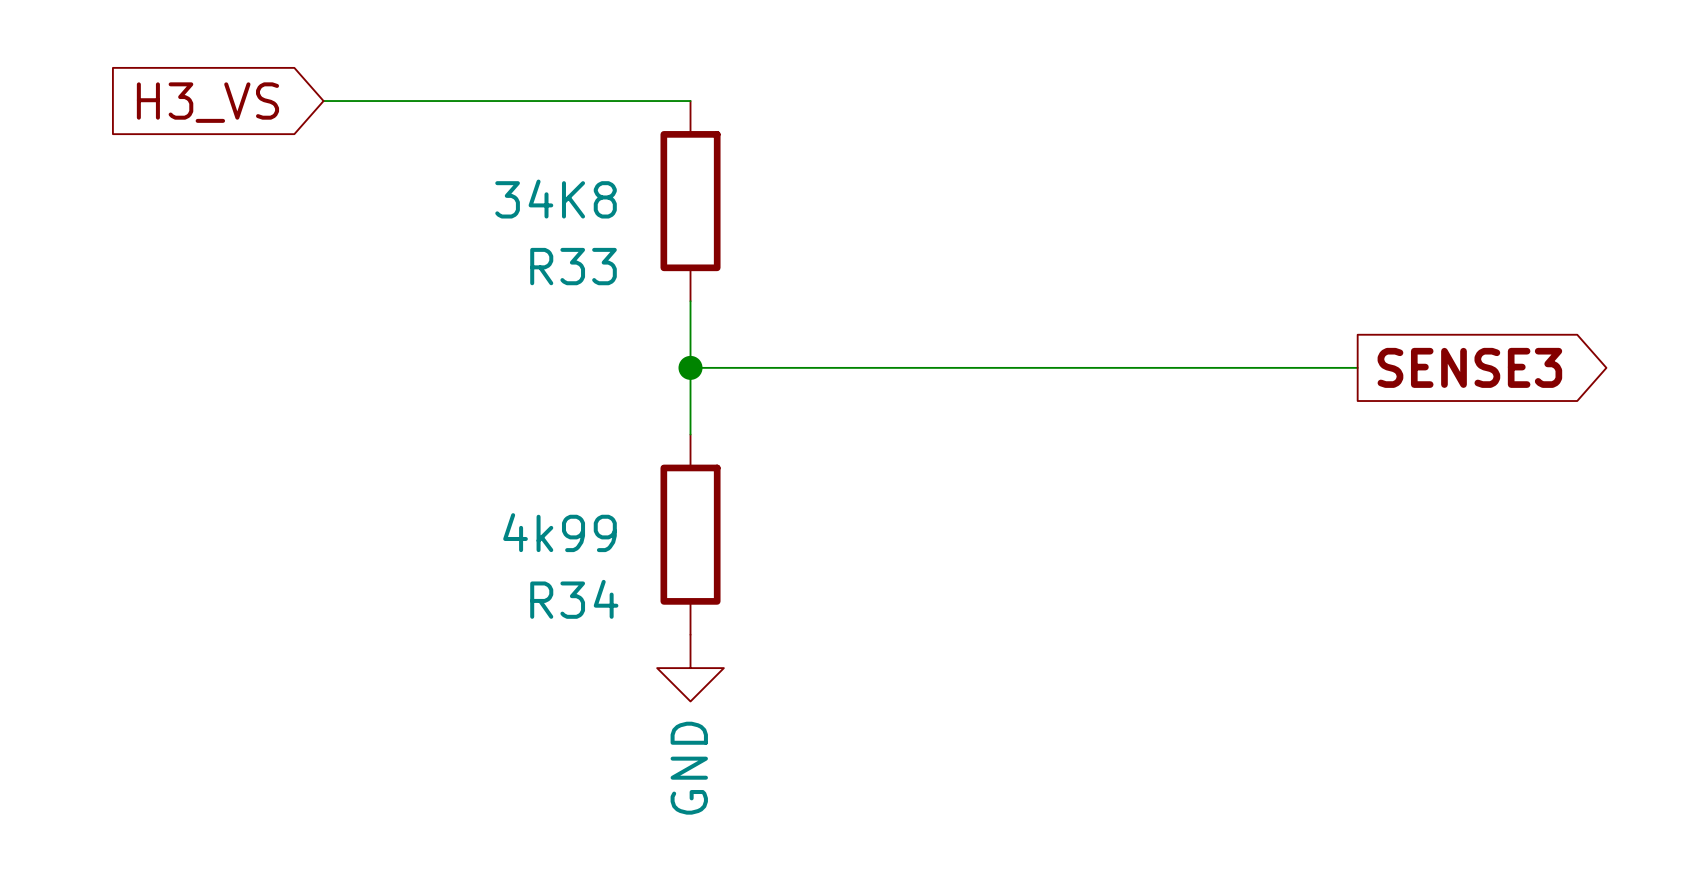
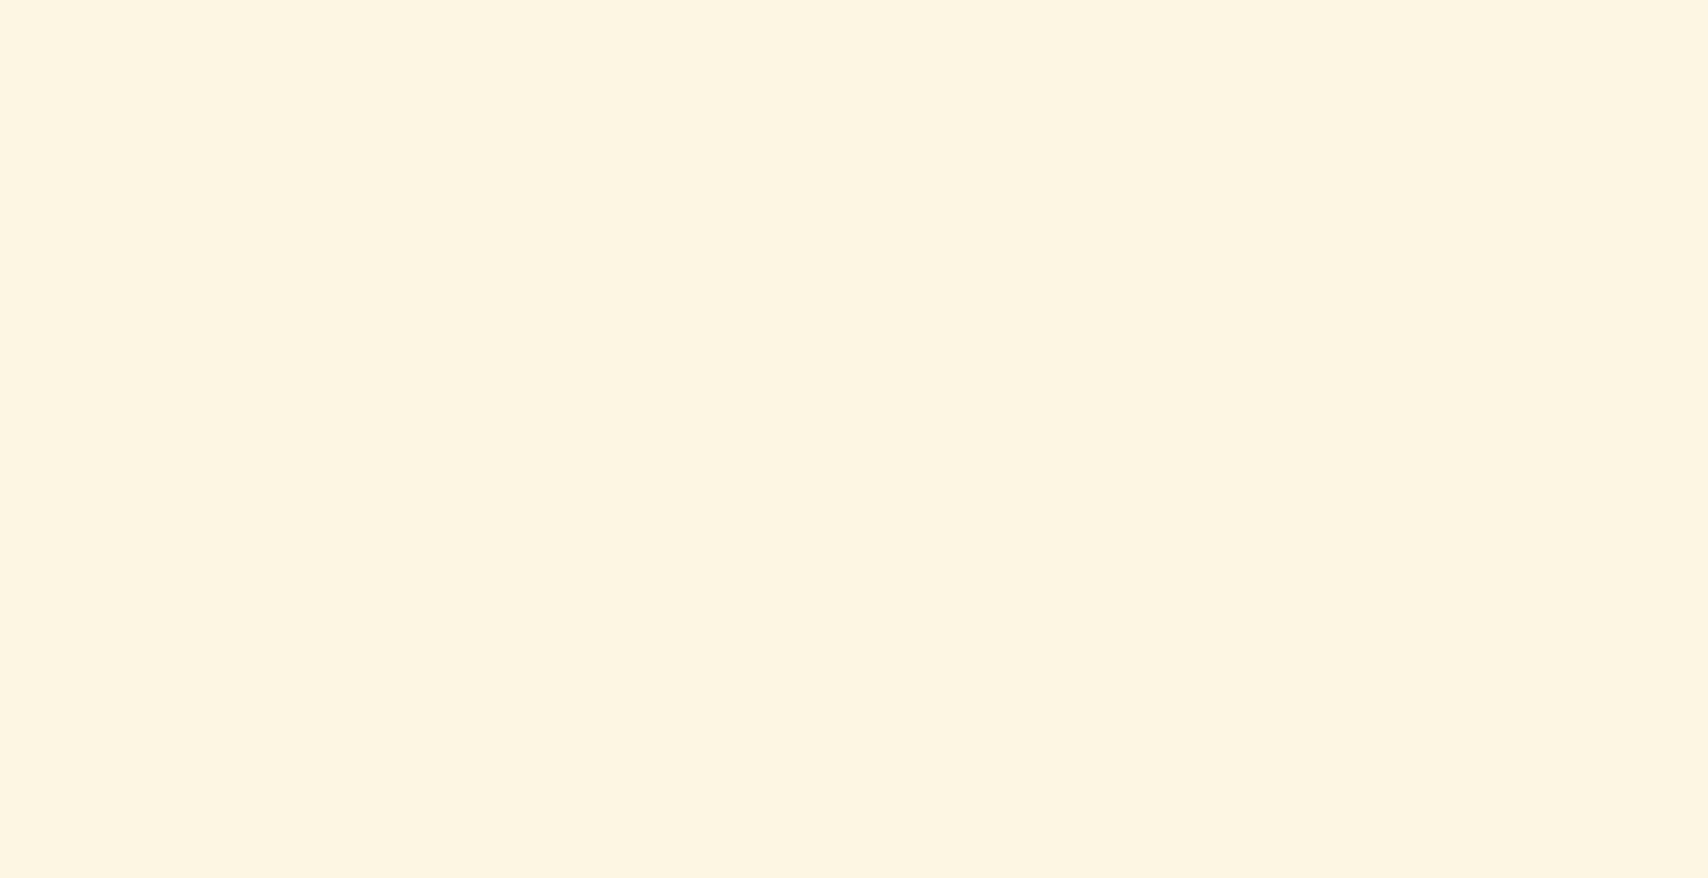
wire: (323, 101) (690, 101) -> none
global label: H3_VS (207, 102) -> none
R33: 34K8 (690, 201) -> none
wire: (690, 301) (690, 434) -> none
wire: (690, 367) (1357, 367) -> none
junction: (690, 367) -> none
global label: SENSE3 (1469, 367) -> none
R34: 4k99 (690, 534) -> none
power symbol: GND (690, 668) -> none

